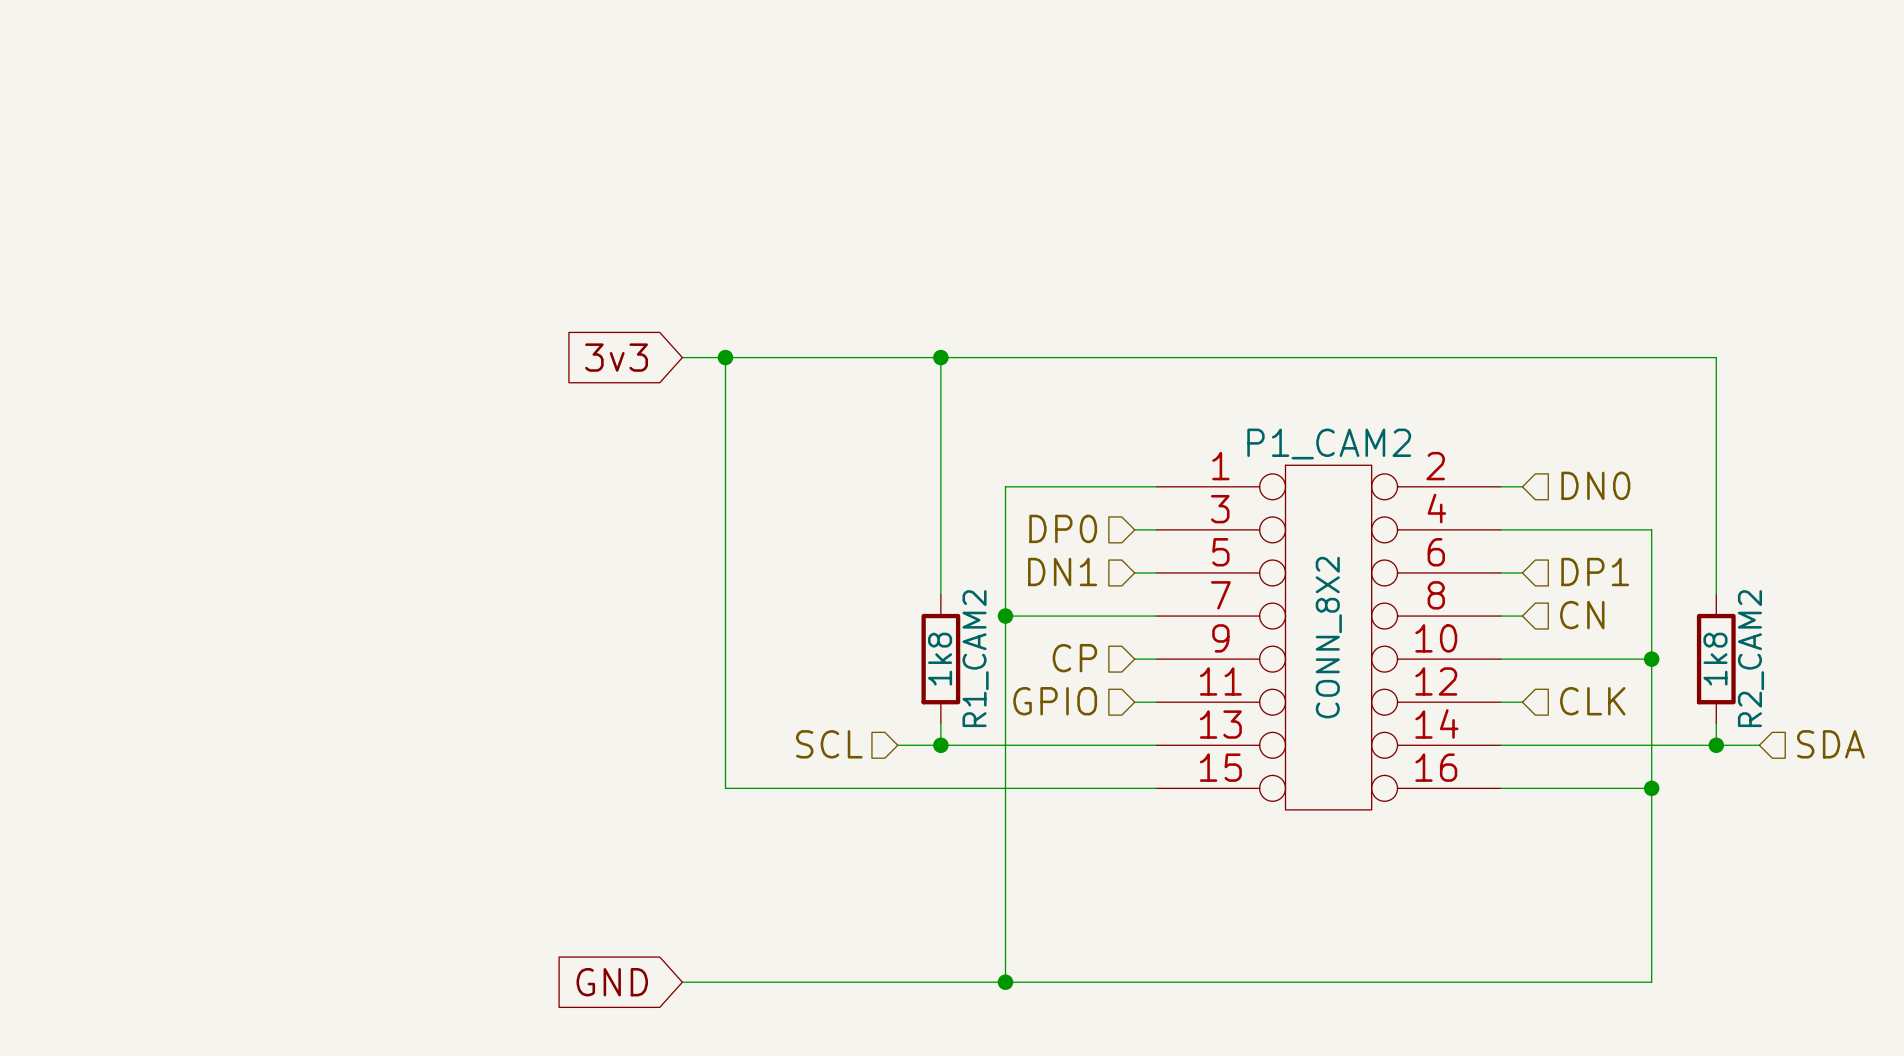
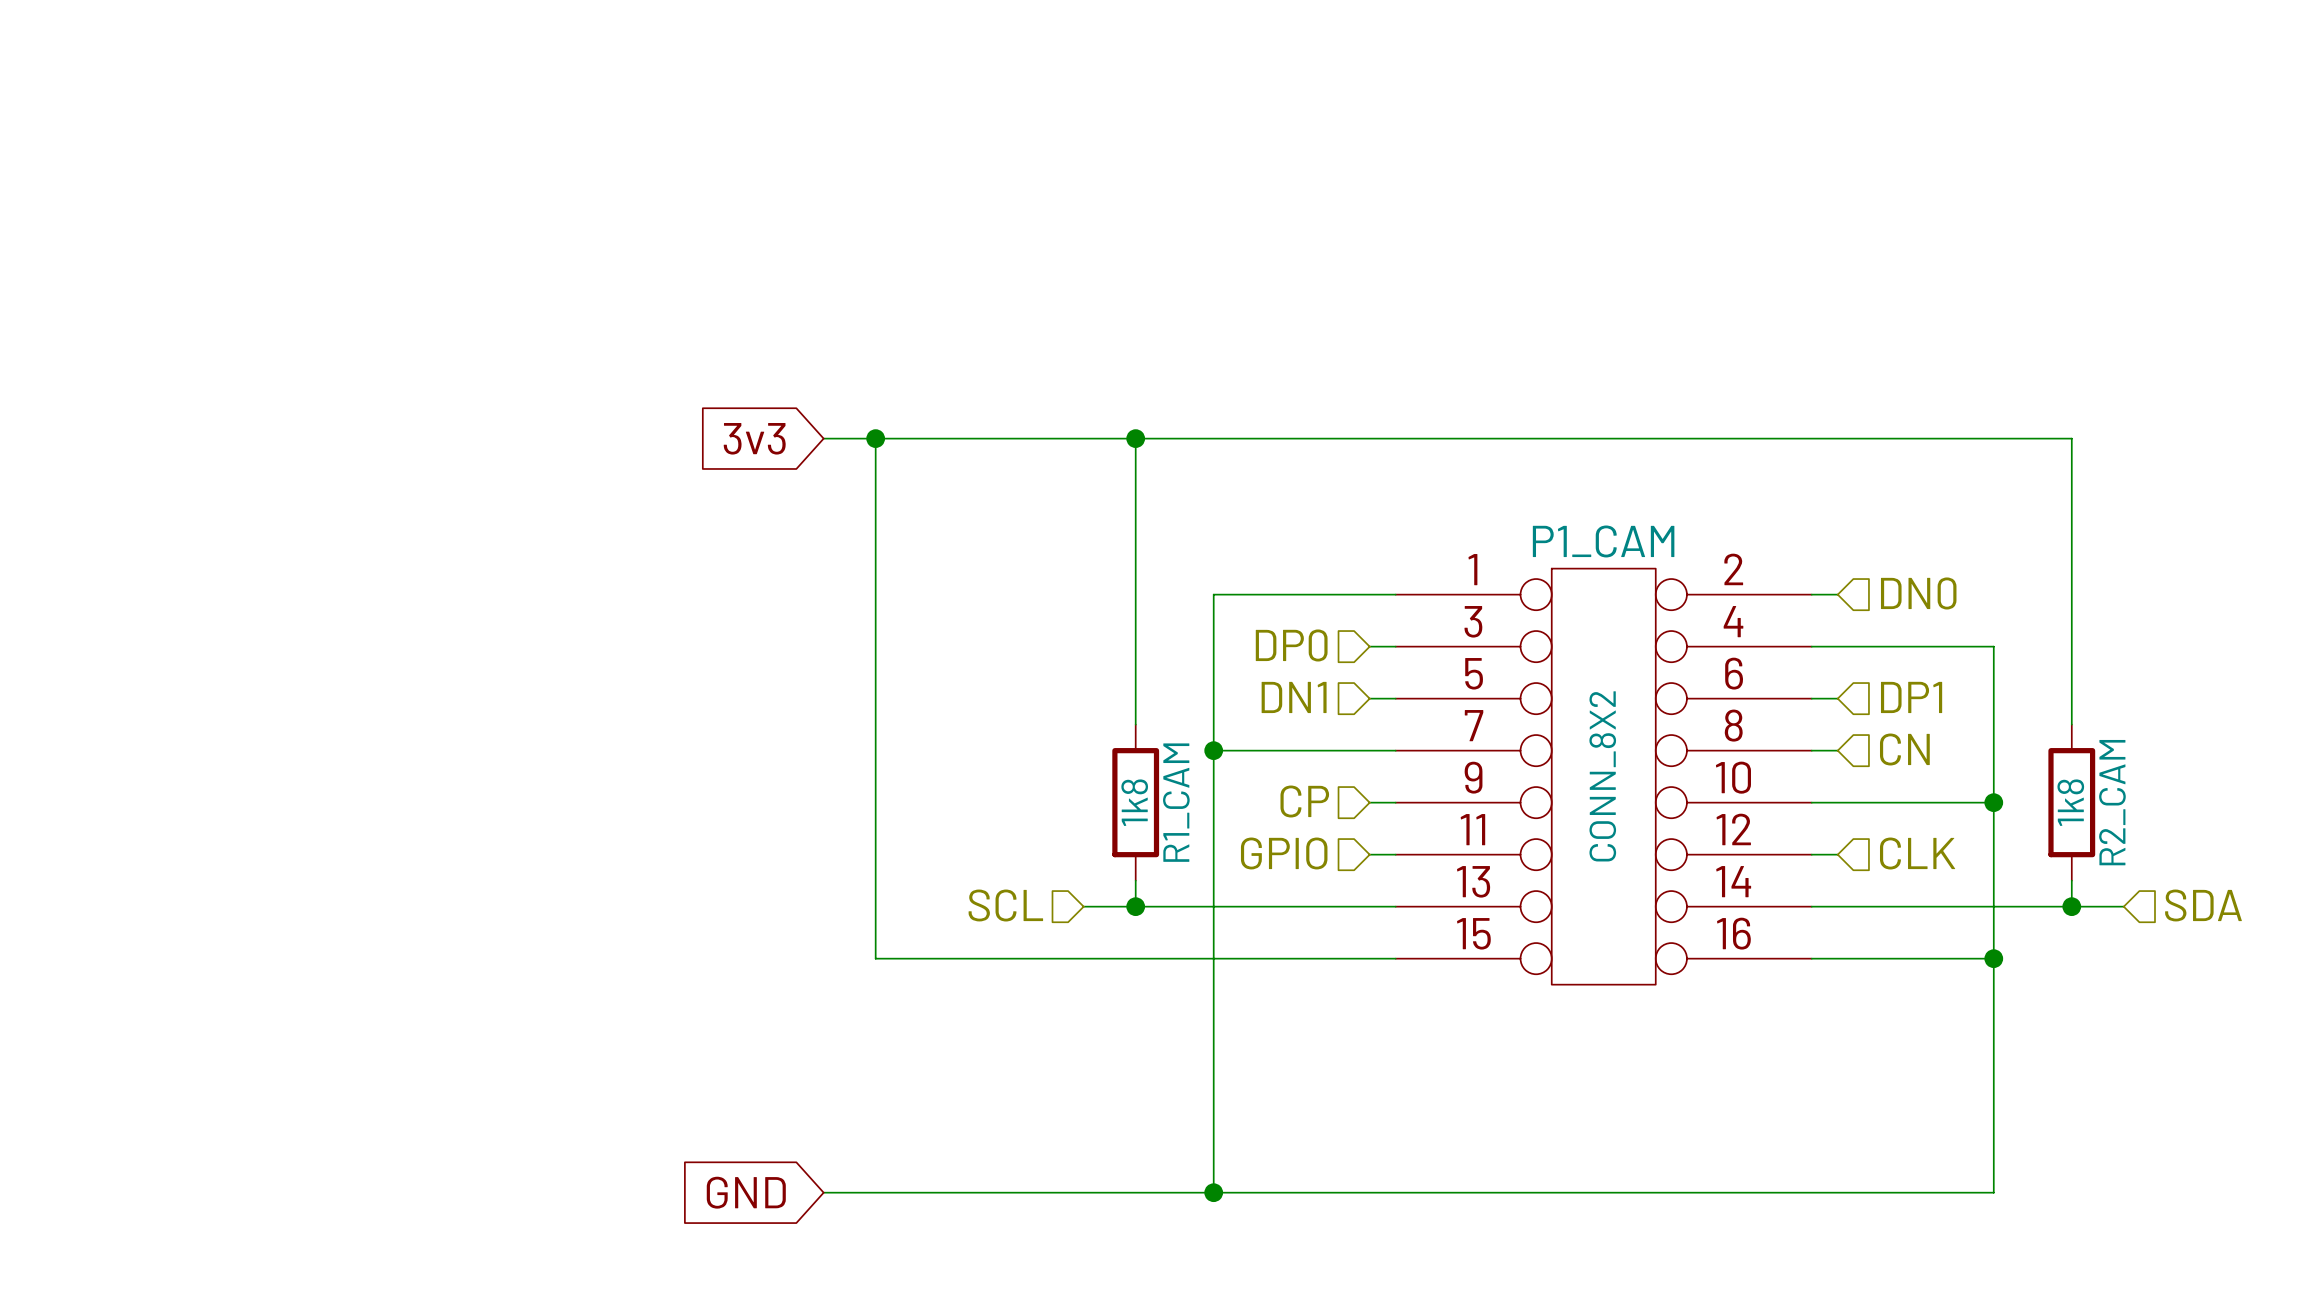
P1_CAM2 name: P1_CAM2 (1329, 444) -> P1_CAM (1603, 541)
R1_CAM2 name: R1_CAM2 (975, 658) -> R1_CAM (1176, 802)
R2_CAM2 name: R2_CAM2 (1750, 658) -> R2_CAM (2112, 802)

